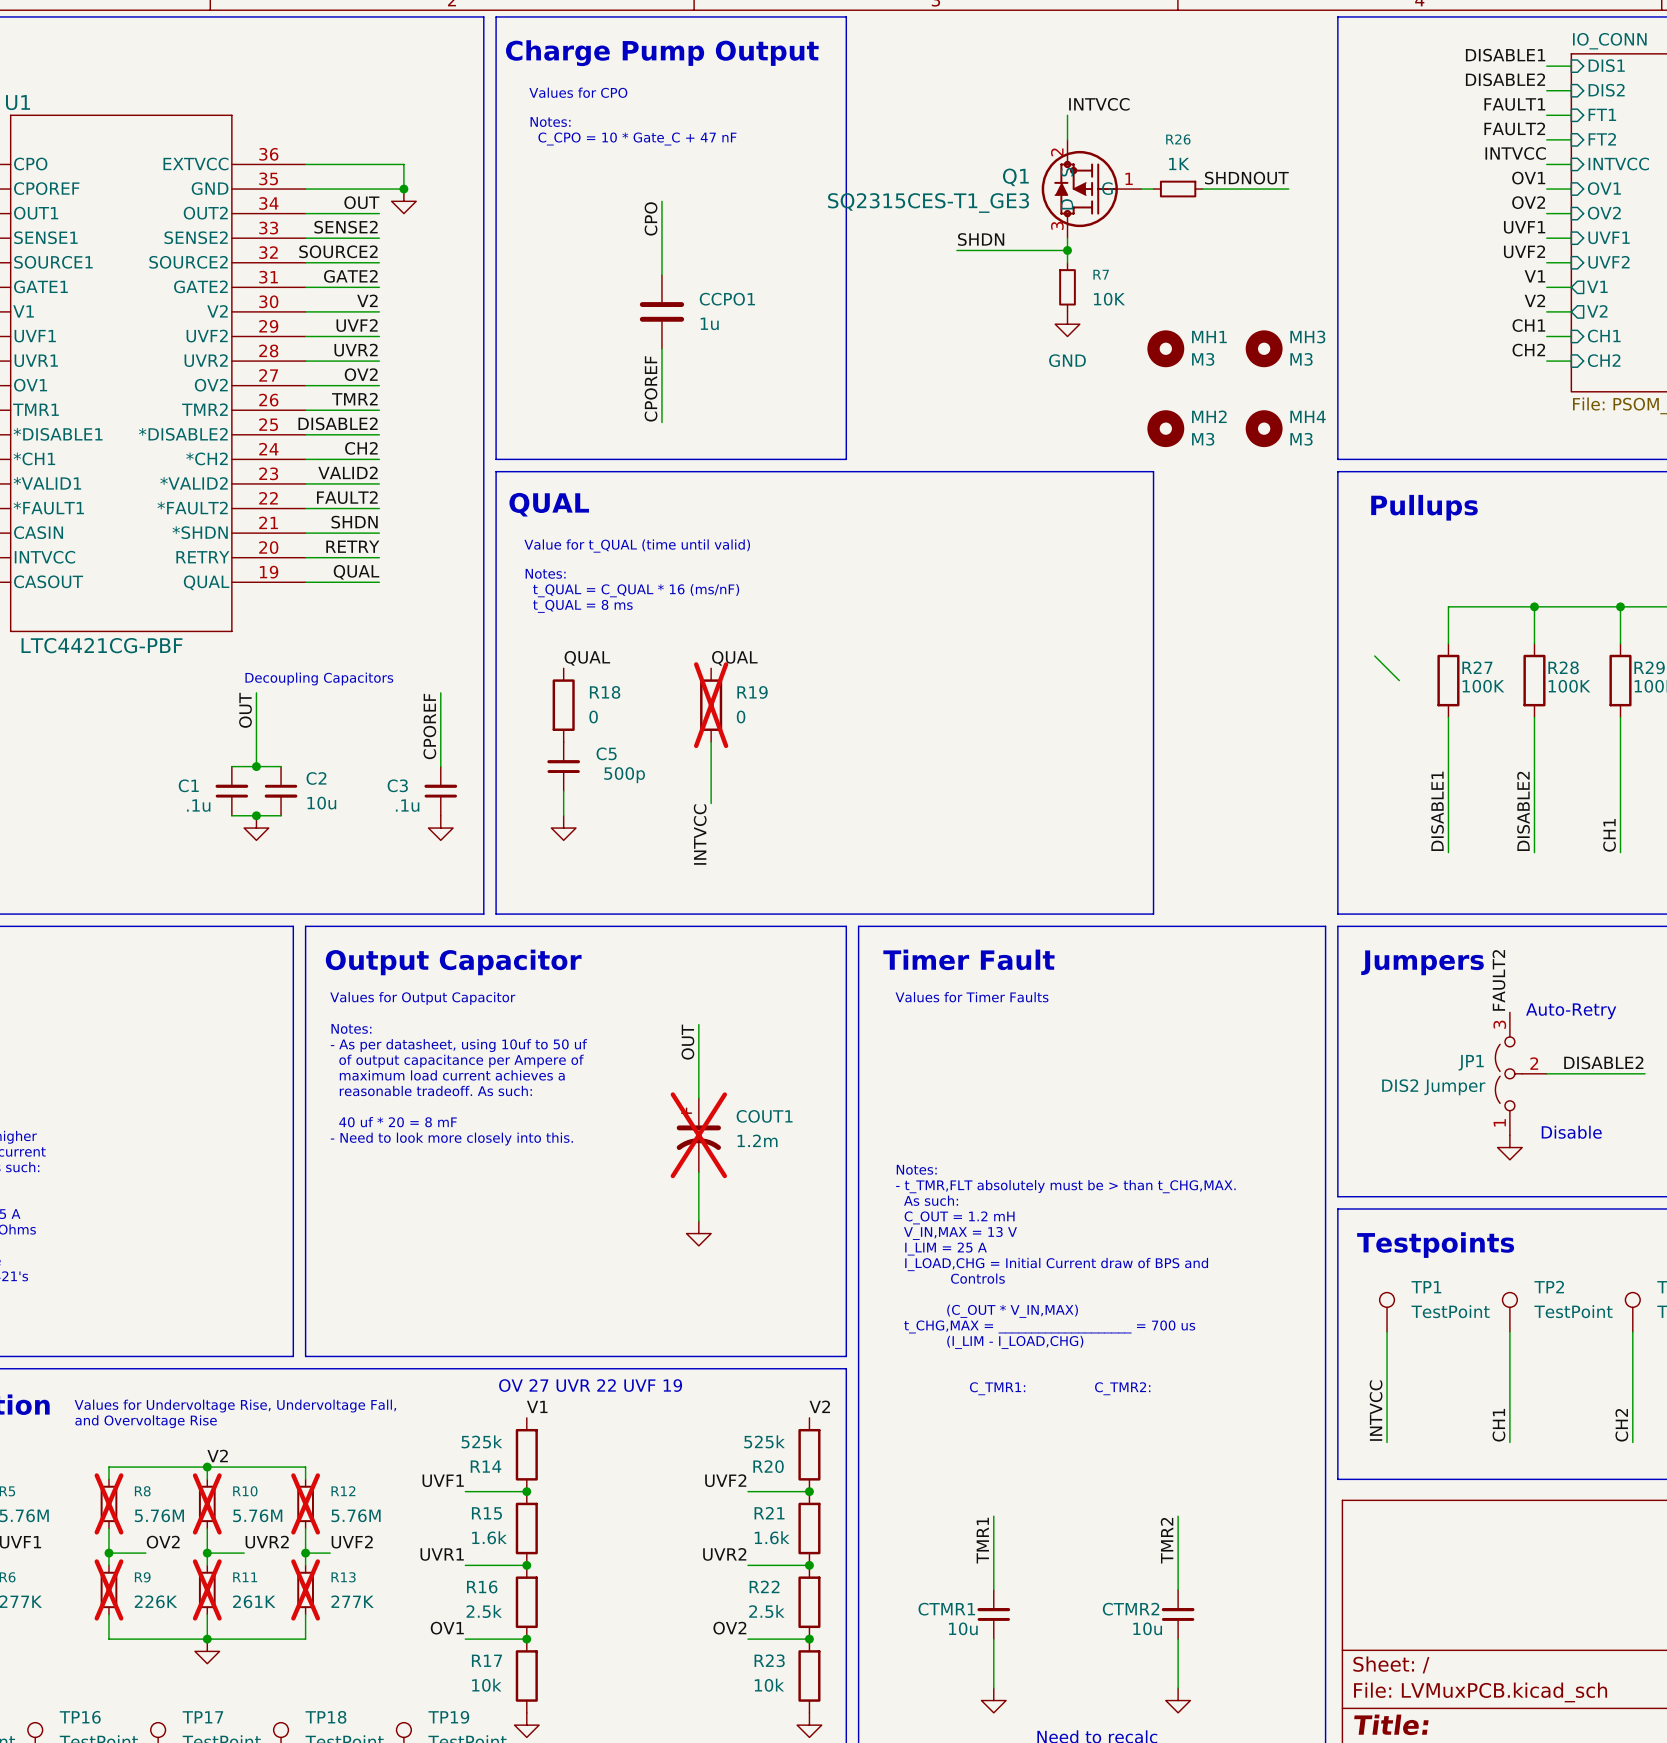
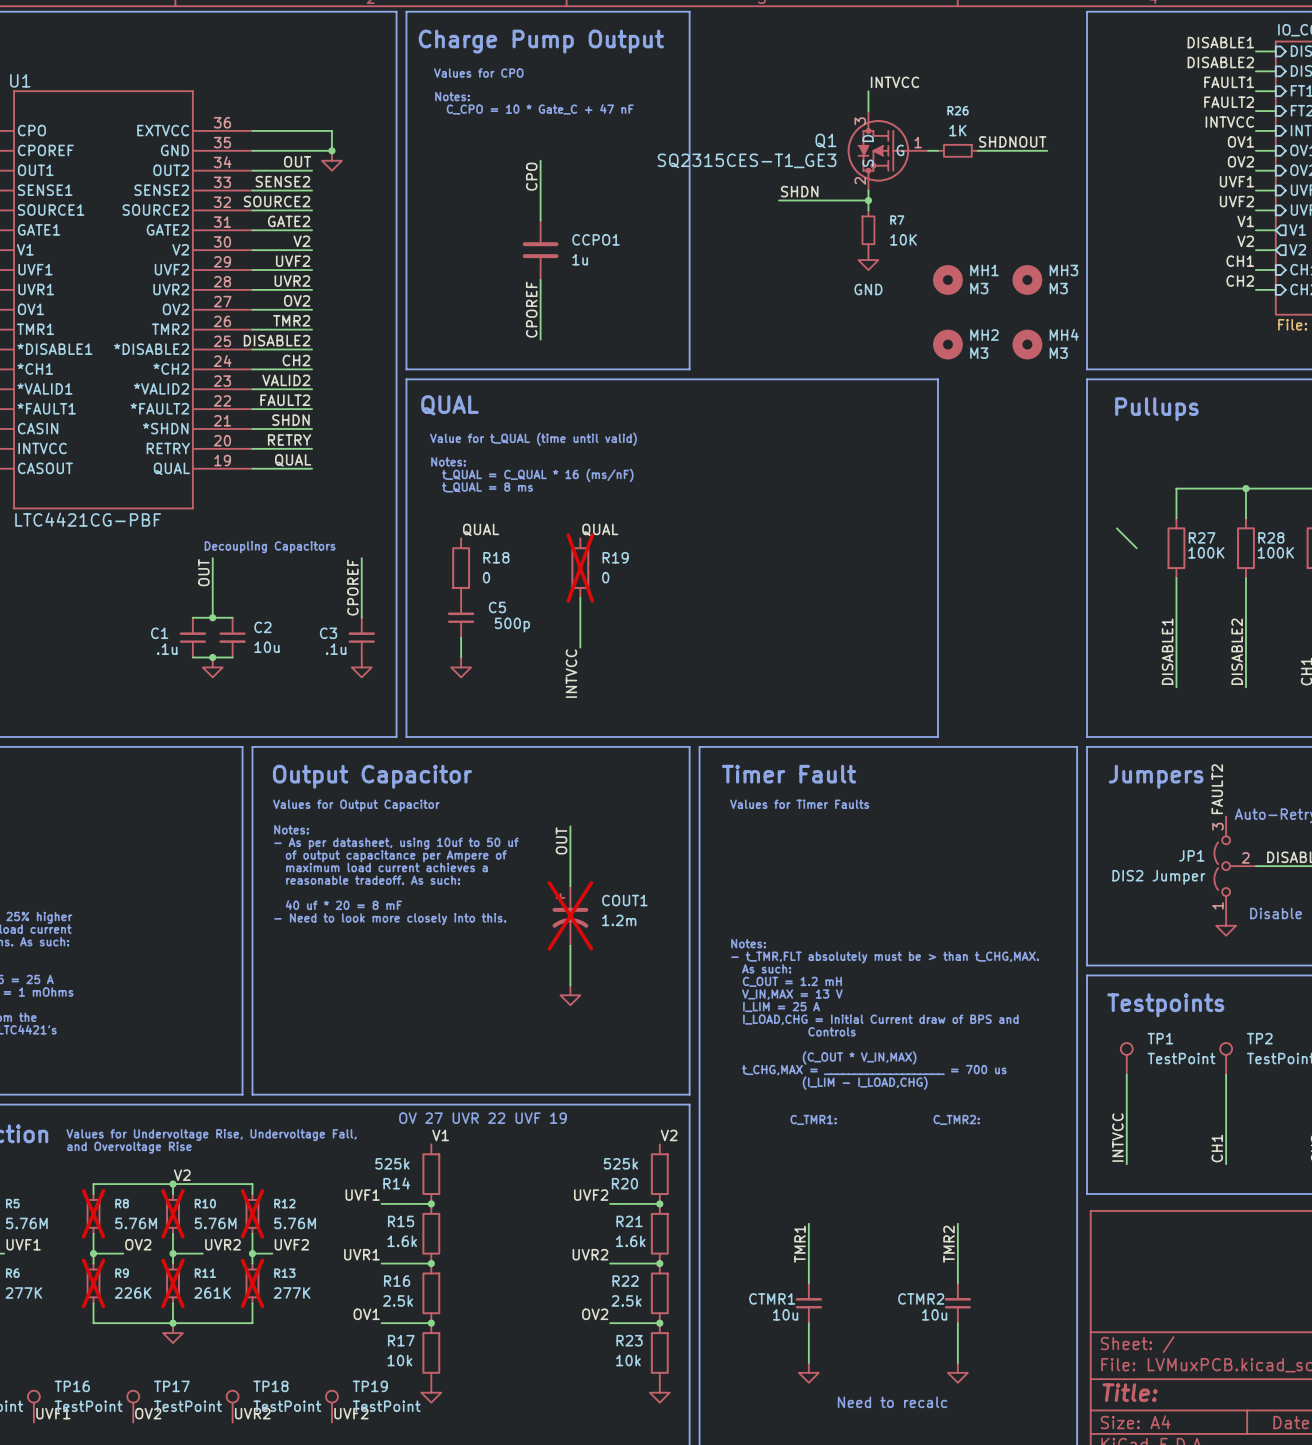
Q1 flip: as is (1079, 189) -> up-down (878, 150)

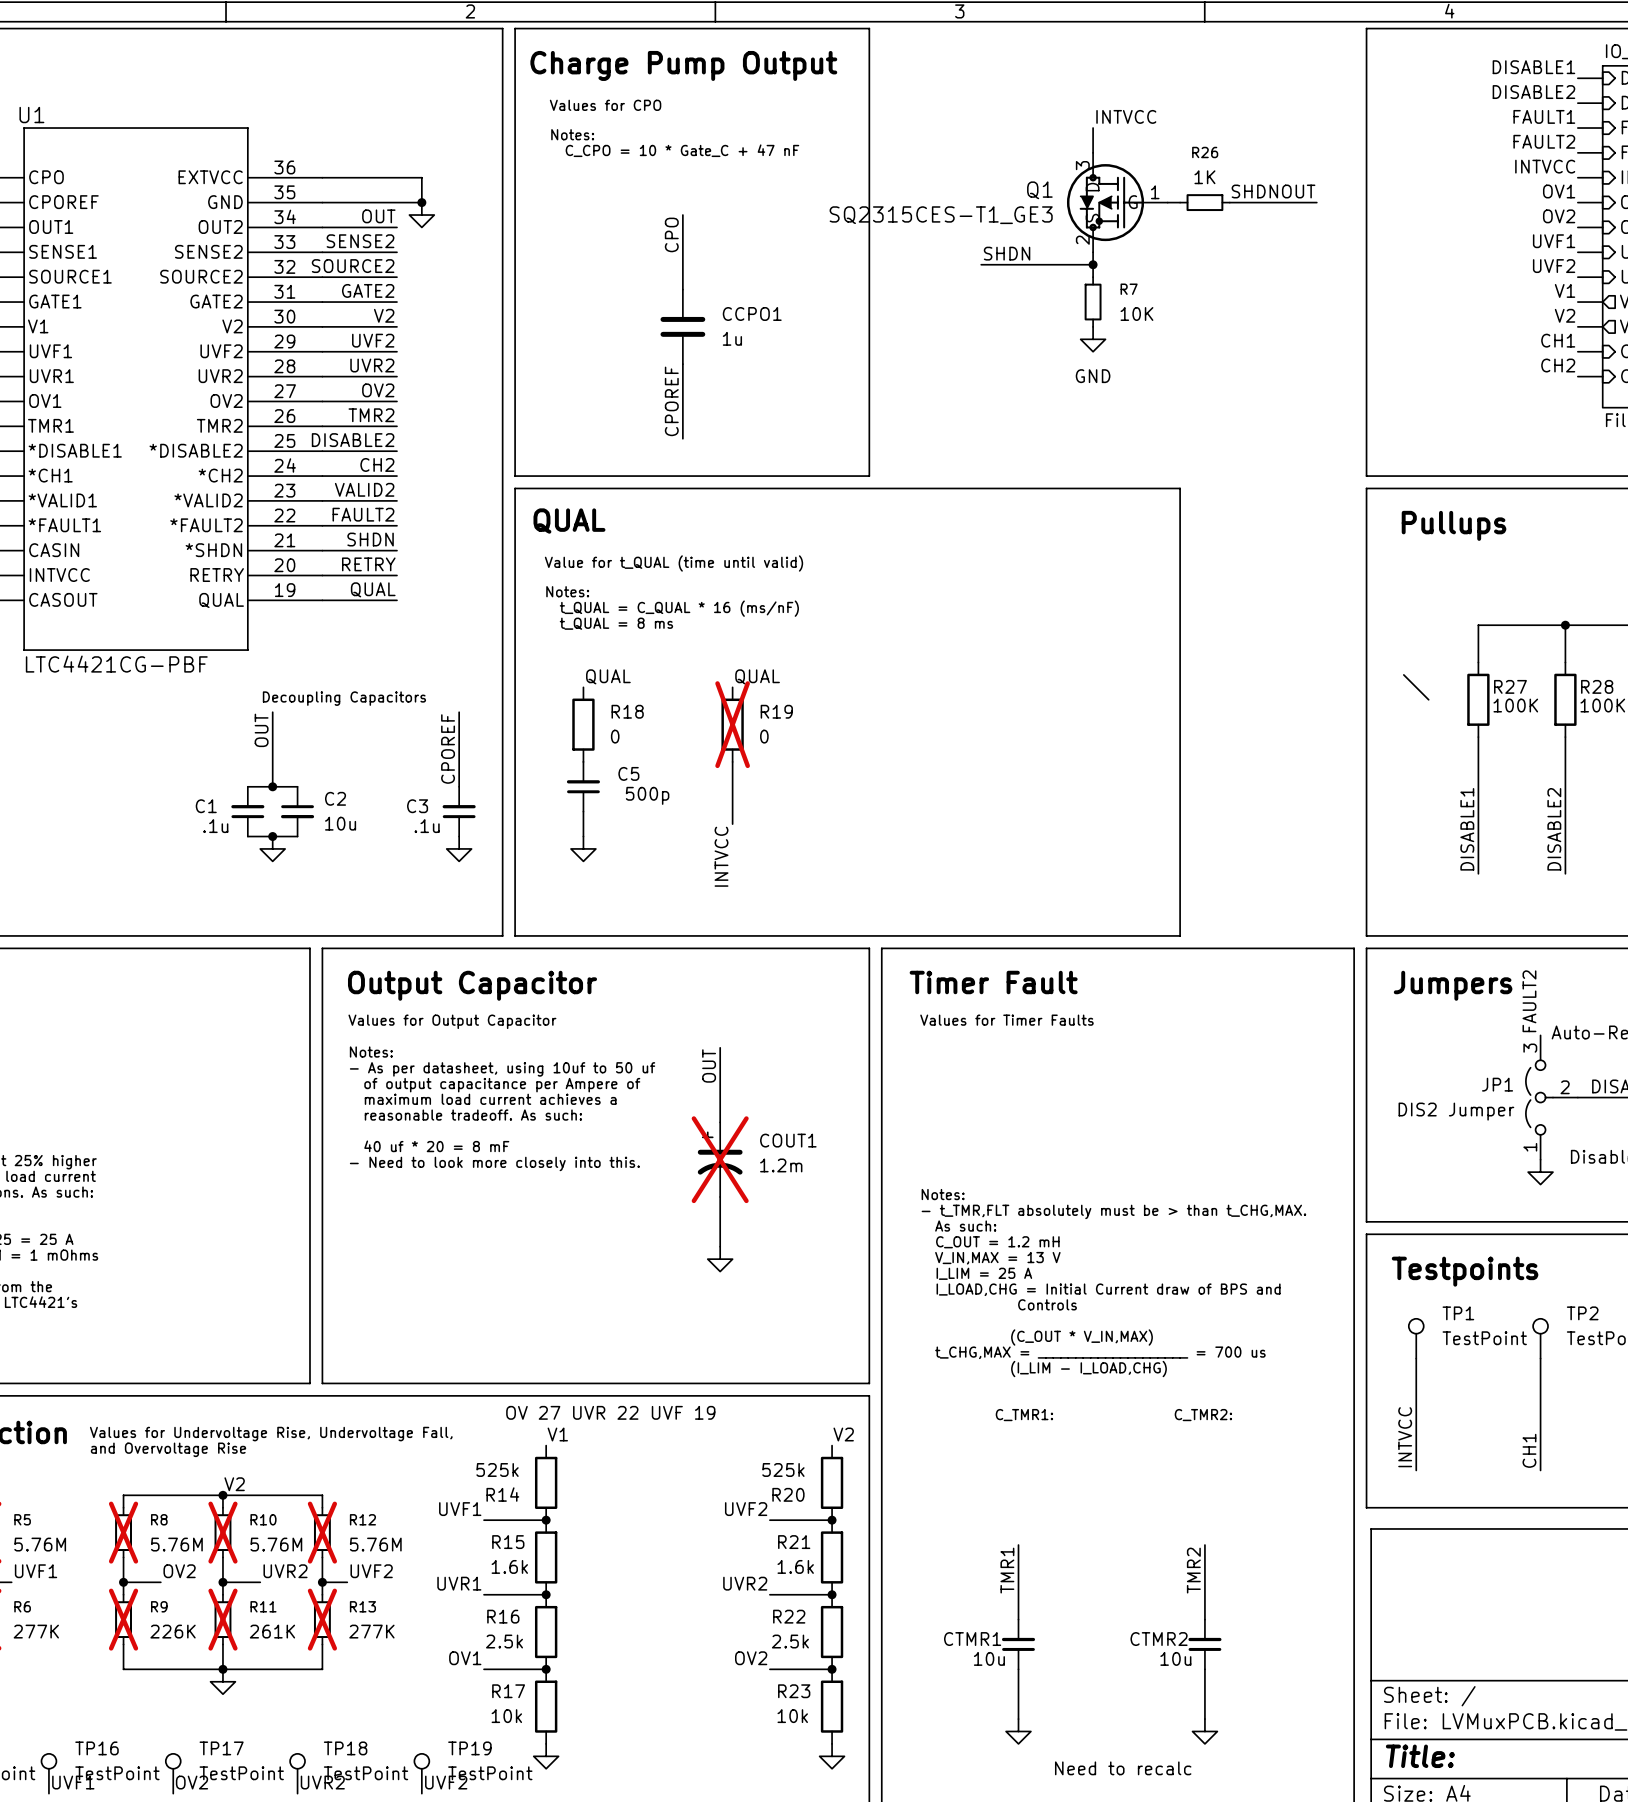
MH1: M3 (947, 279) -> none
MH3: M3 (1027, 279) -> none
MH2: M3 (947, 344) -> none
MH4: M3 (1027, 344) -> none

